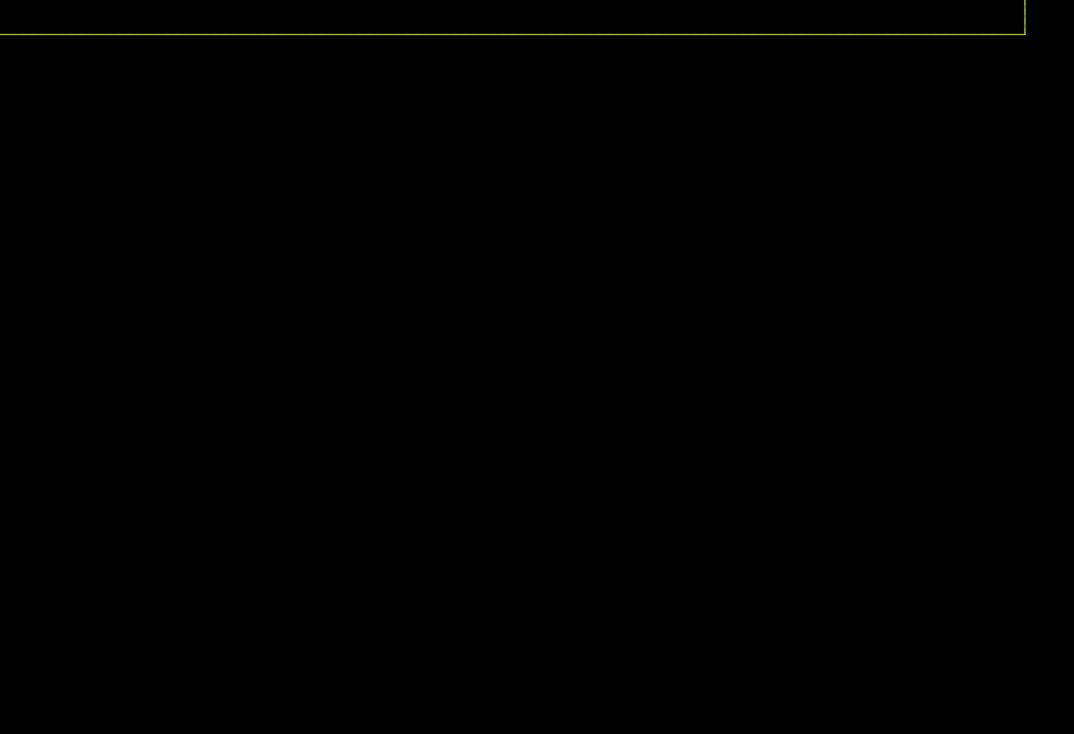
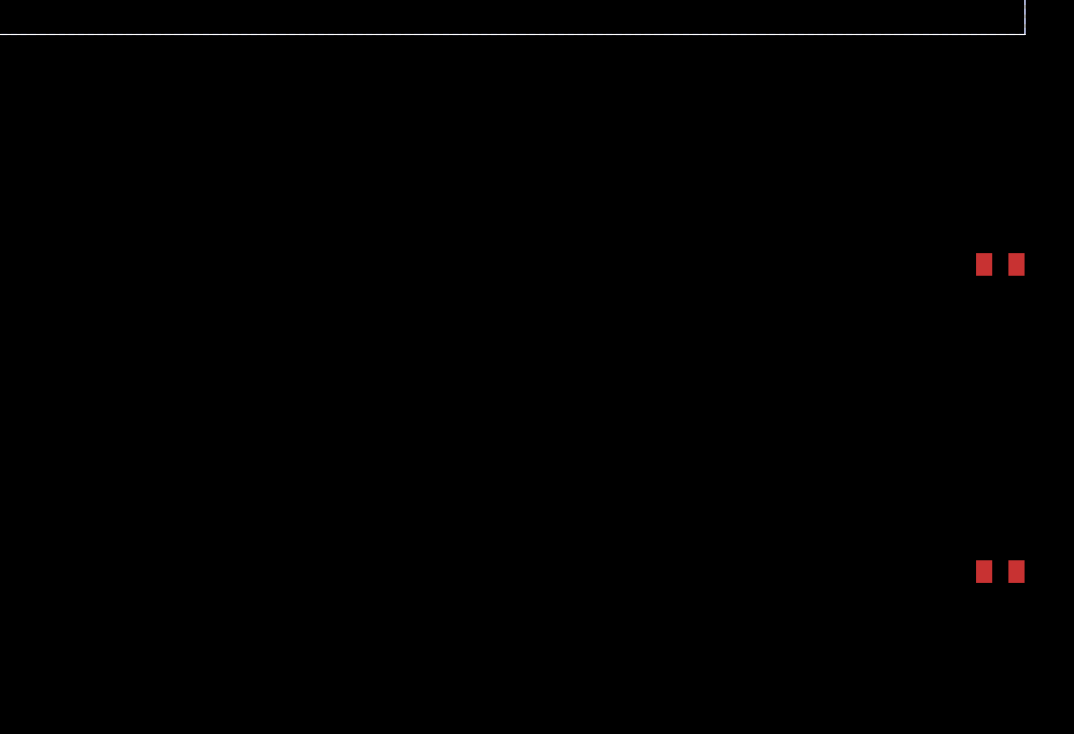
part: none -> (1000, 264)
part: none -> (1000, 571)

